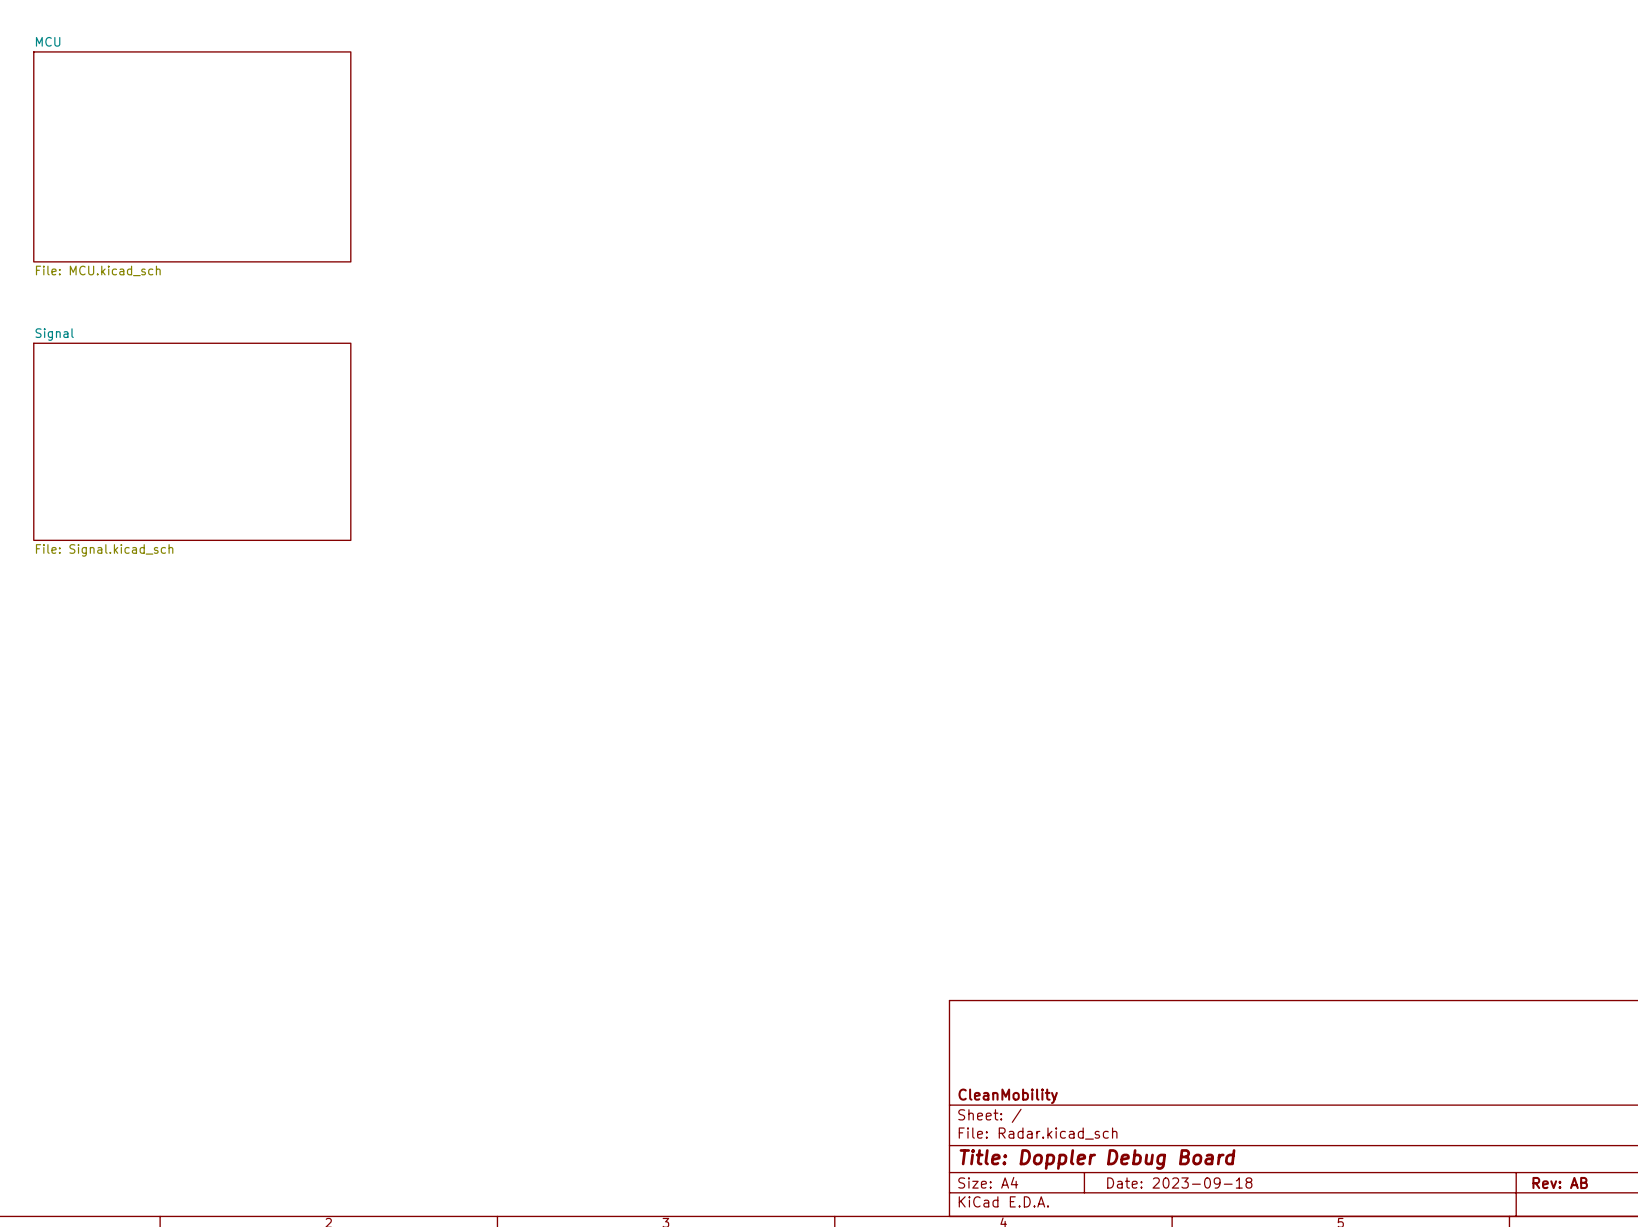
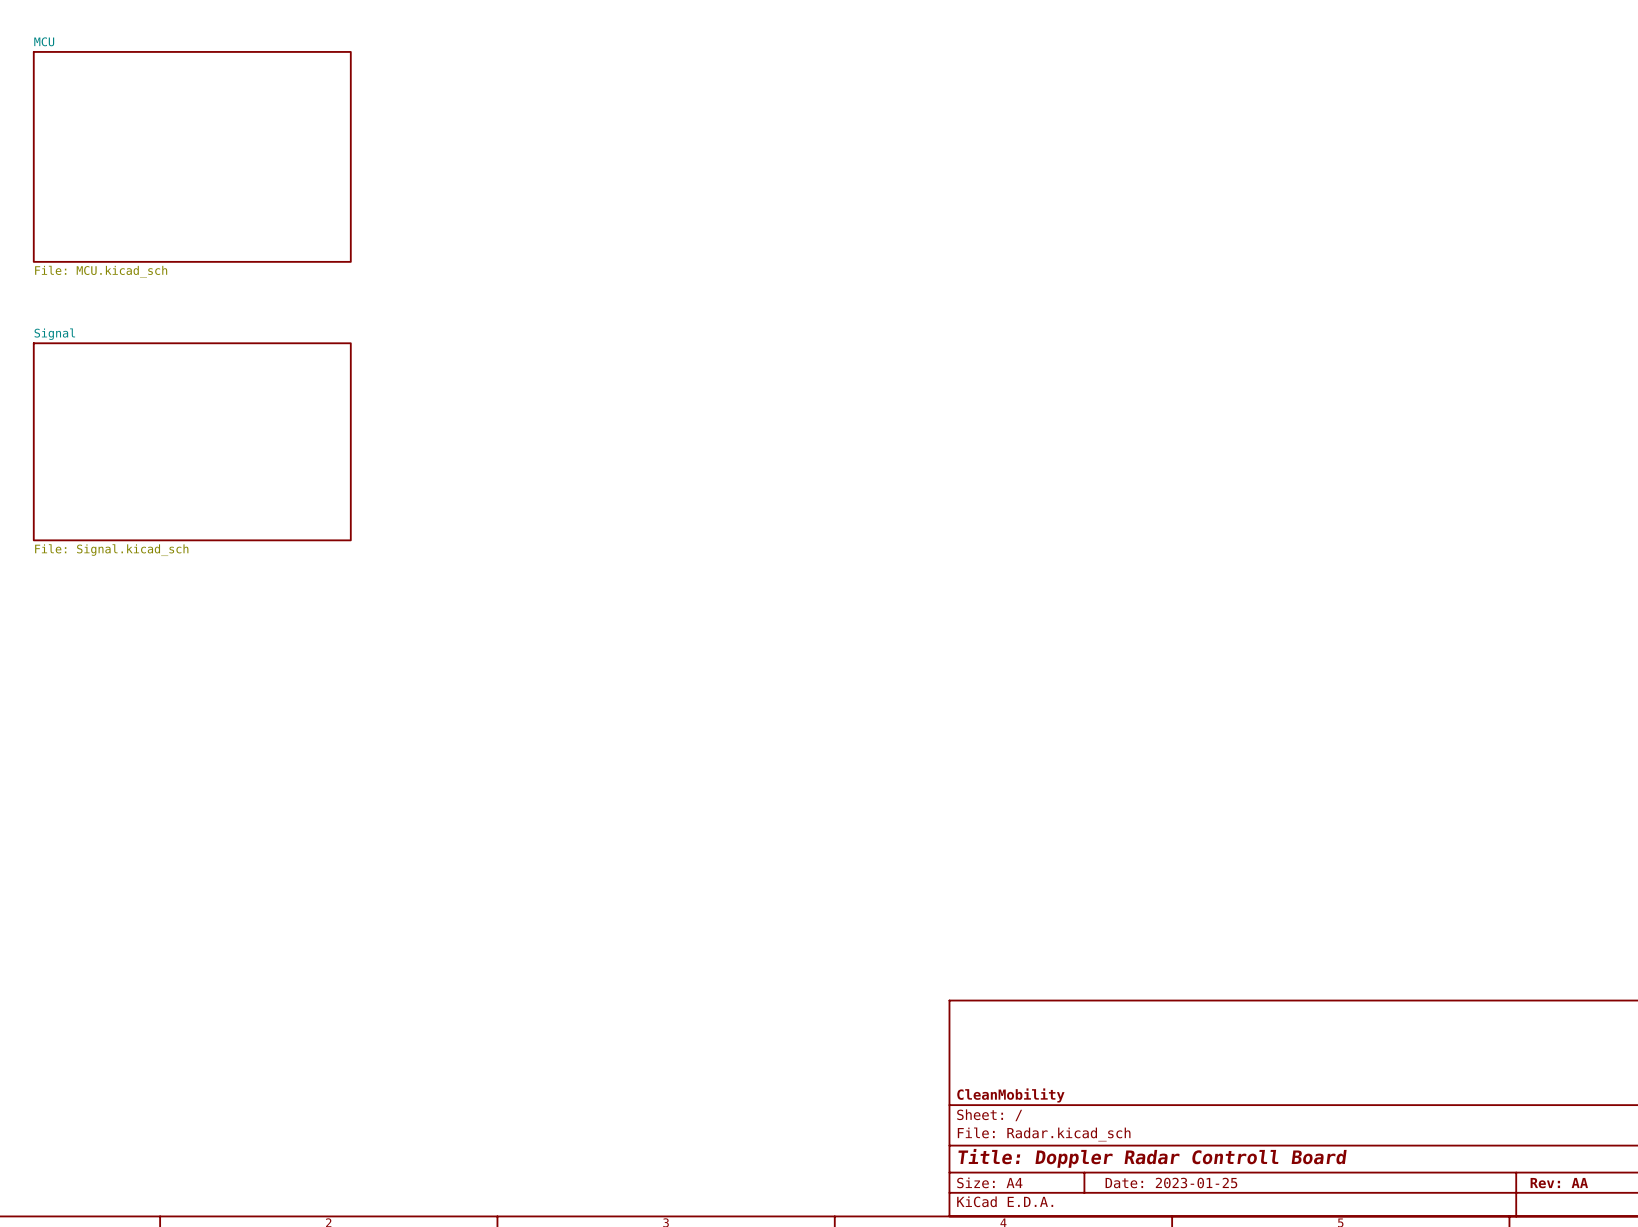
title block: Title: Doppler Debug Board (1097, 1159) -> Title: Doppler Radar Controll Board (1152, 1158)
title block: Date: 2023-09-18 (1179, 1183) -> Date: 2023-01-25 (1171, 1183)
title block: Rev: AB (1560, 1183) -> Rev: AA (1559, 1183)

